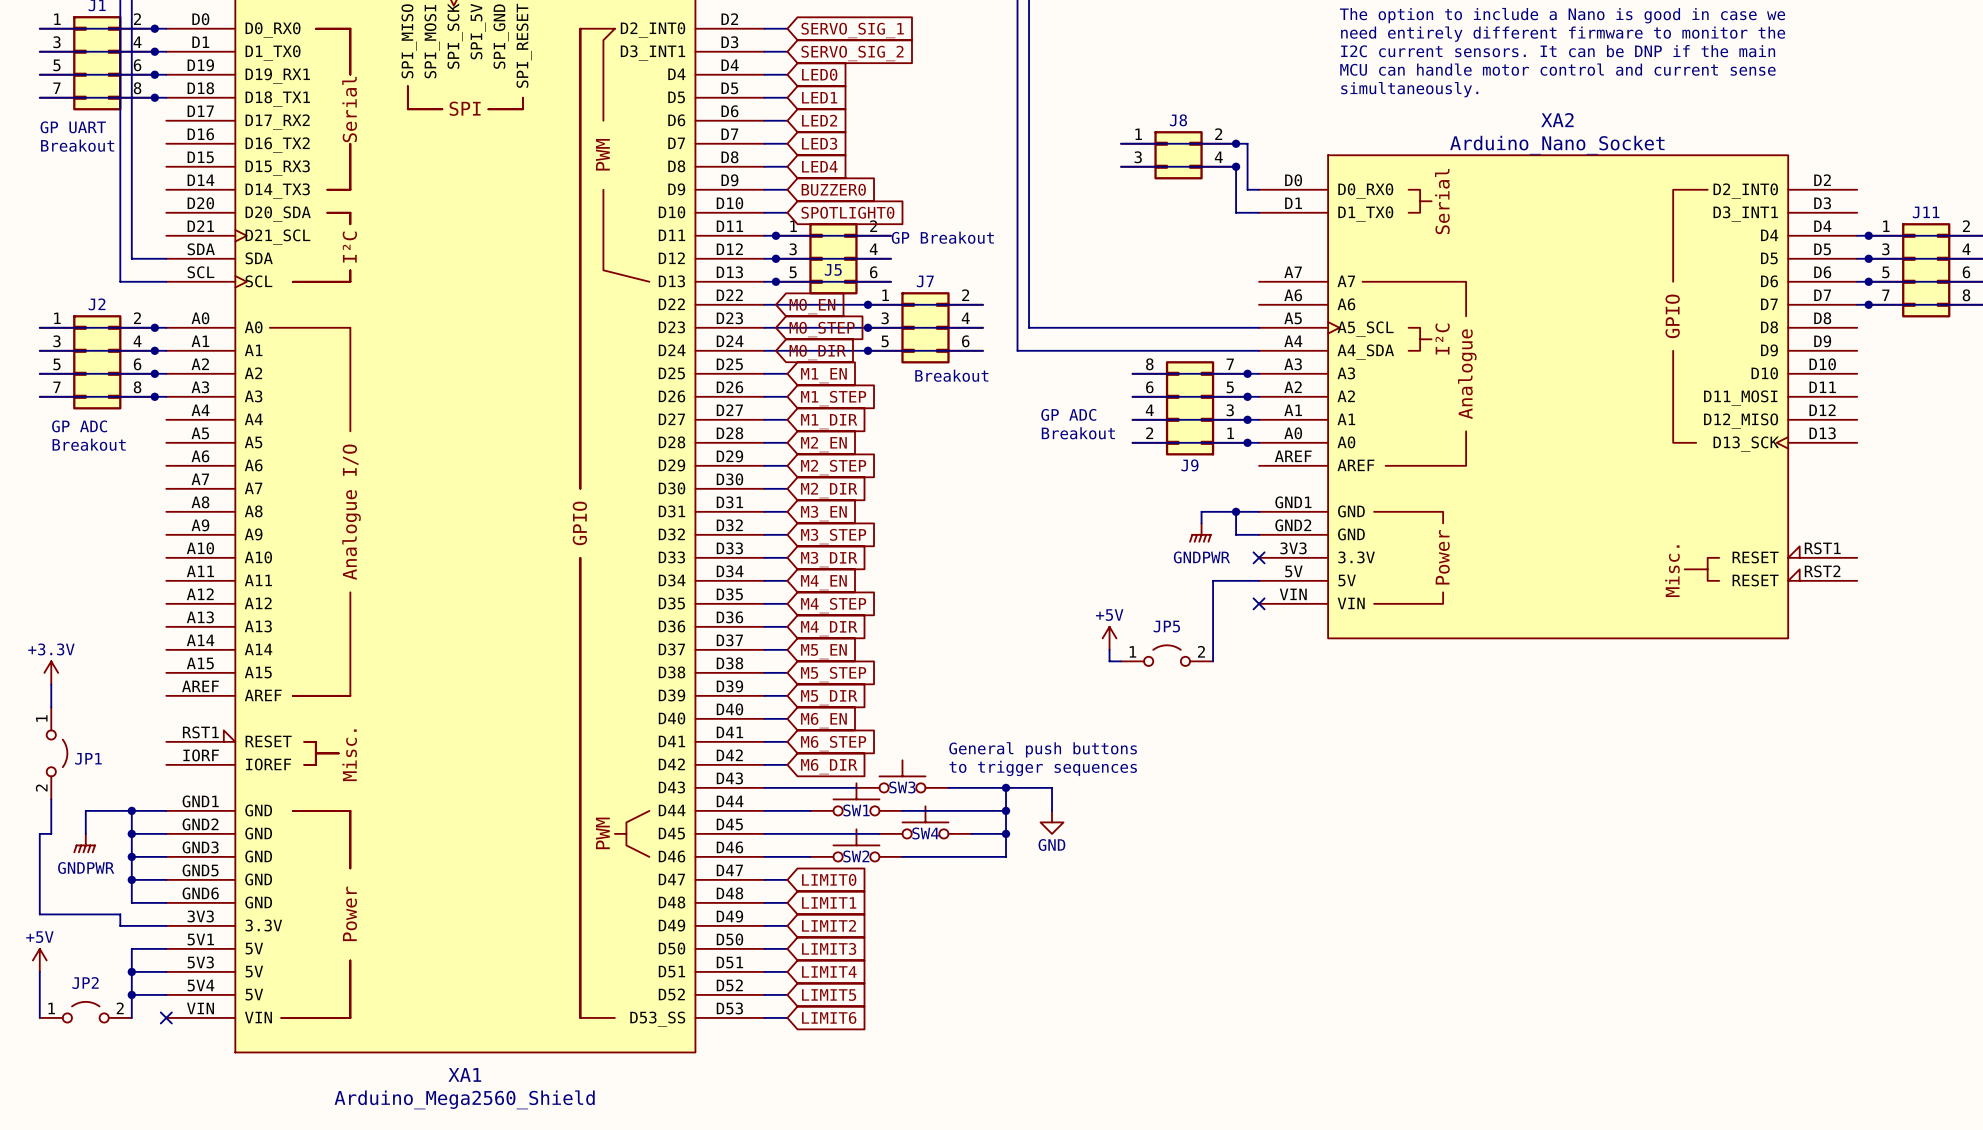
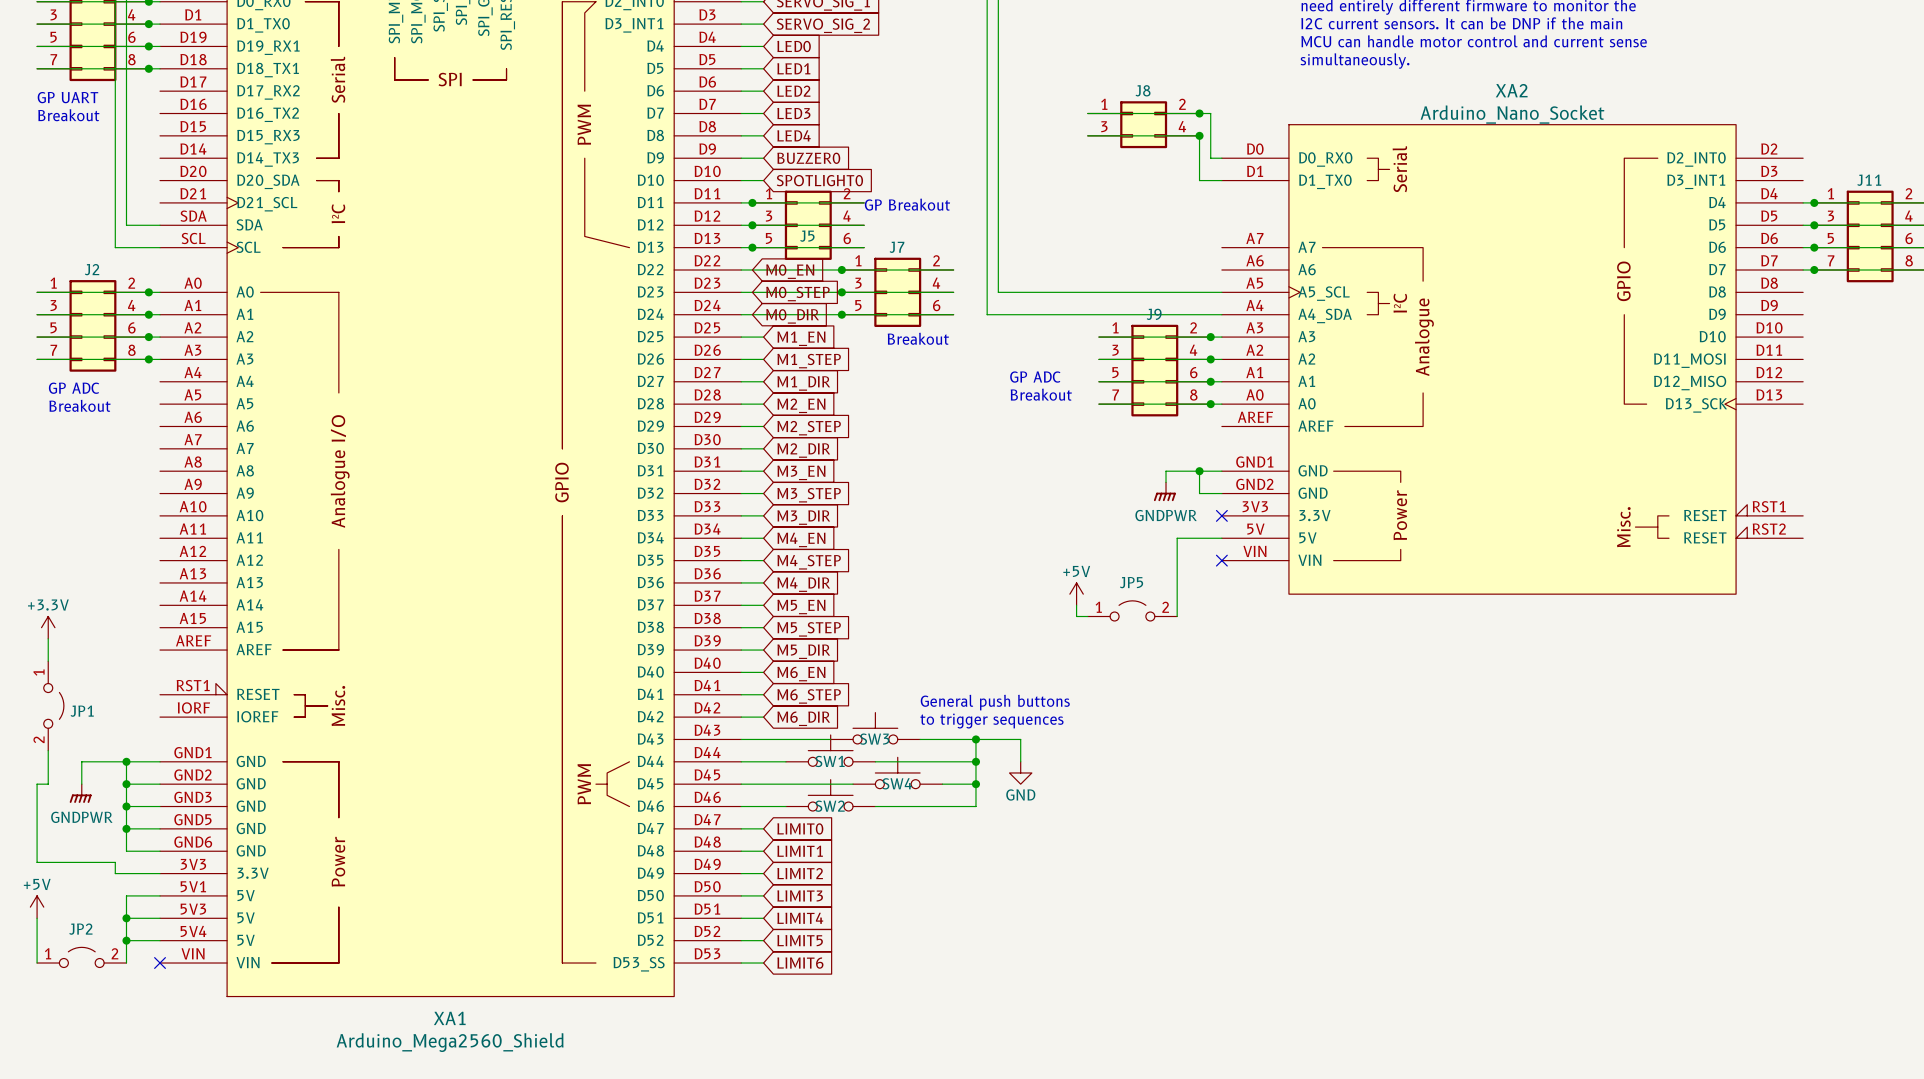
J9 rotation: 0° (1190, 408) -> 180° (1154, 370)

